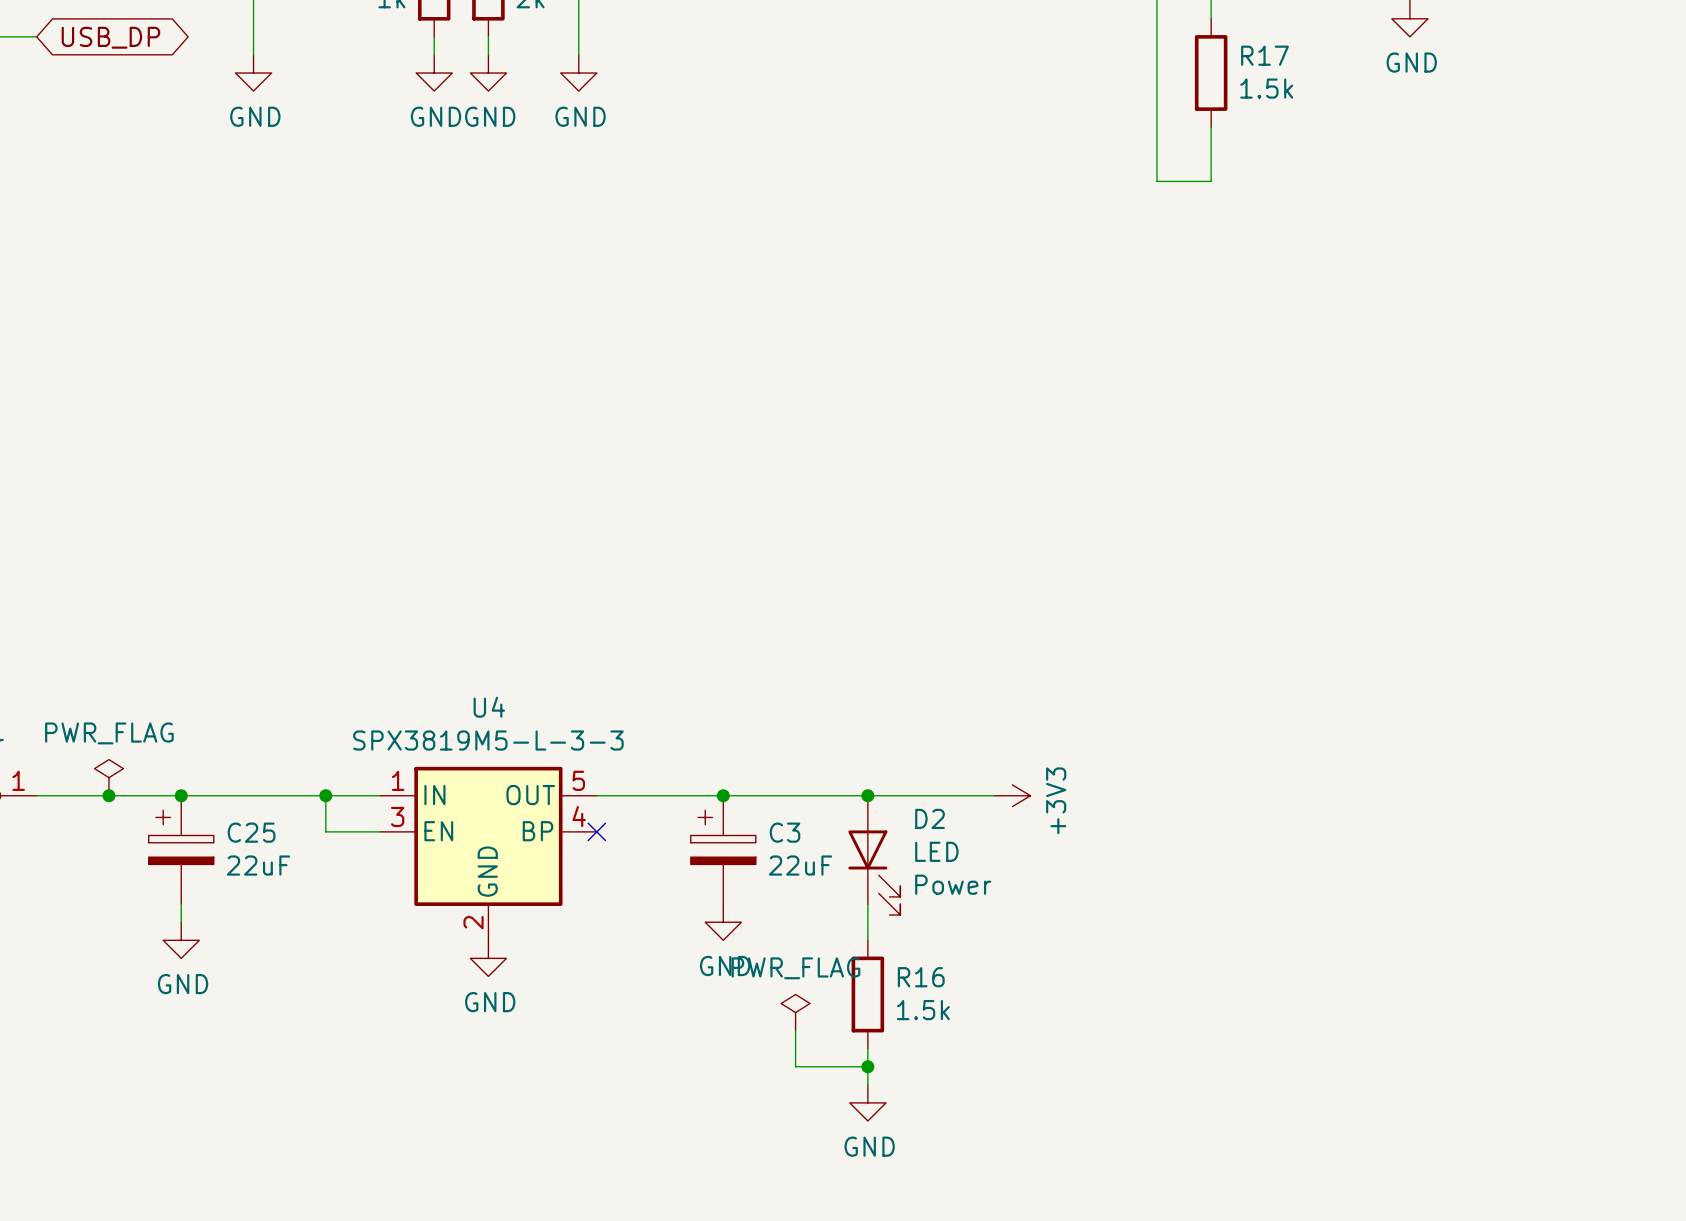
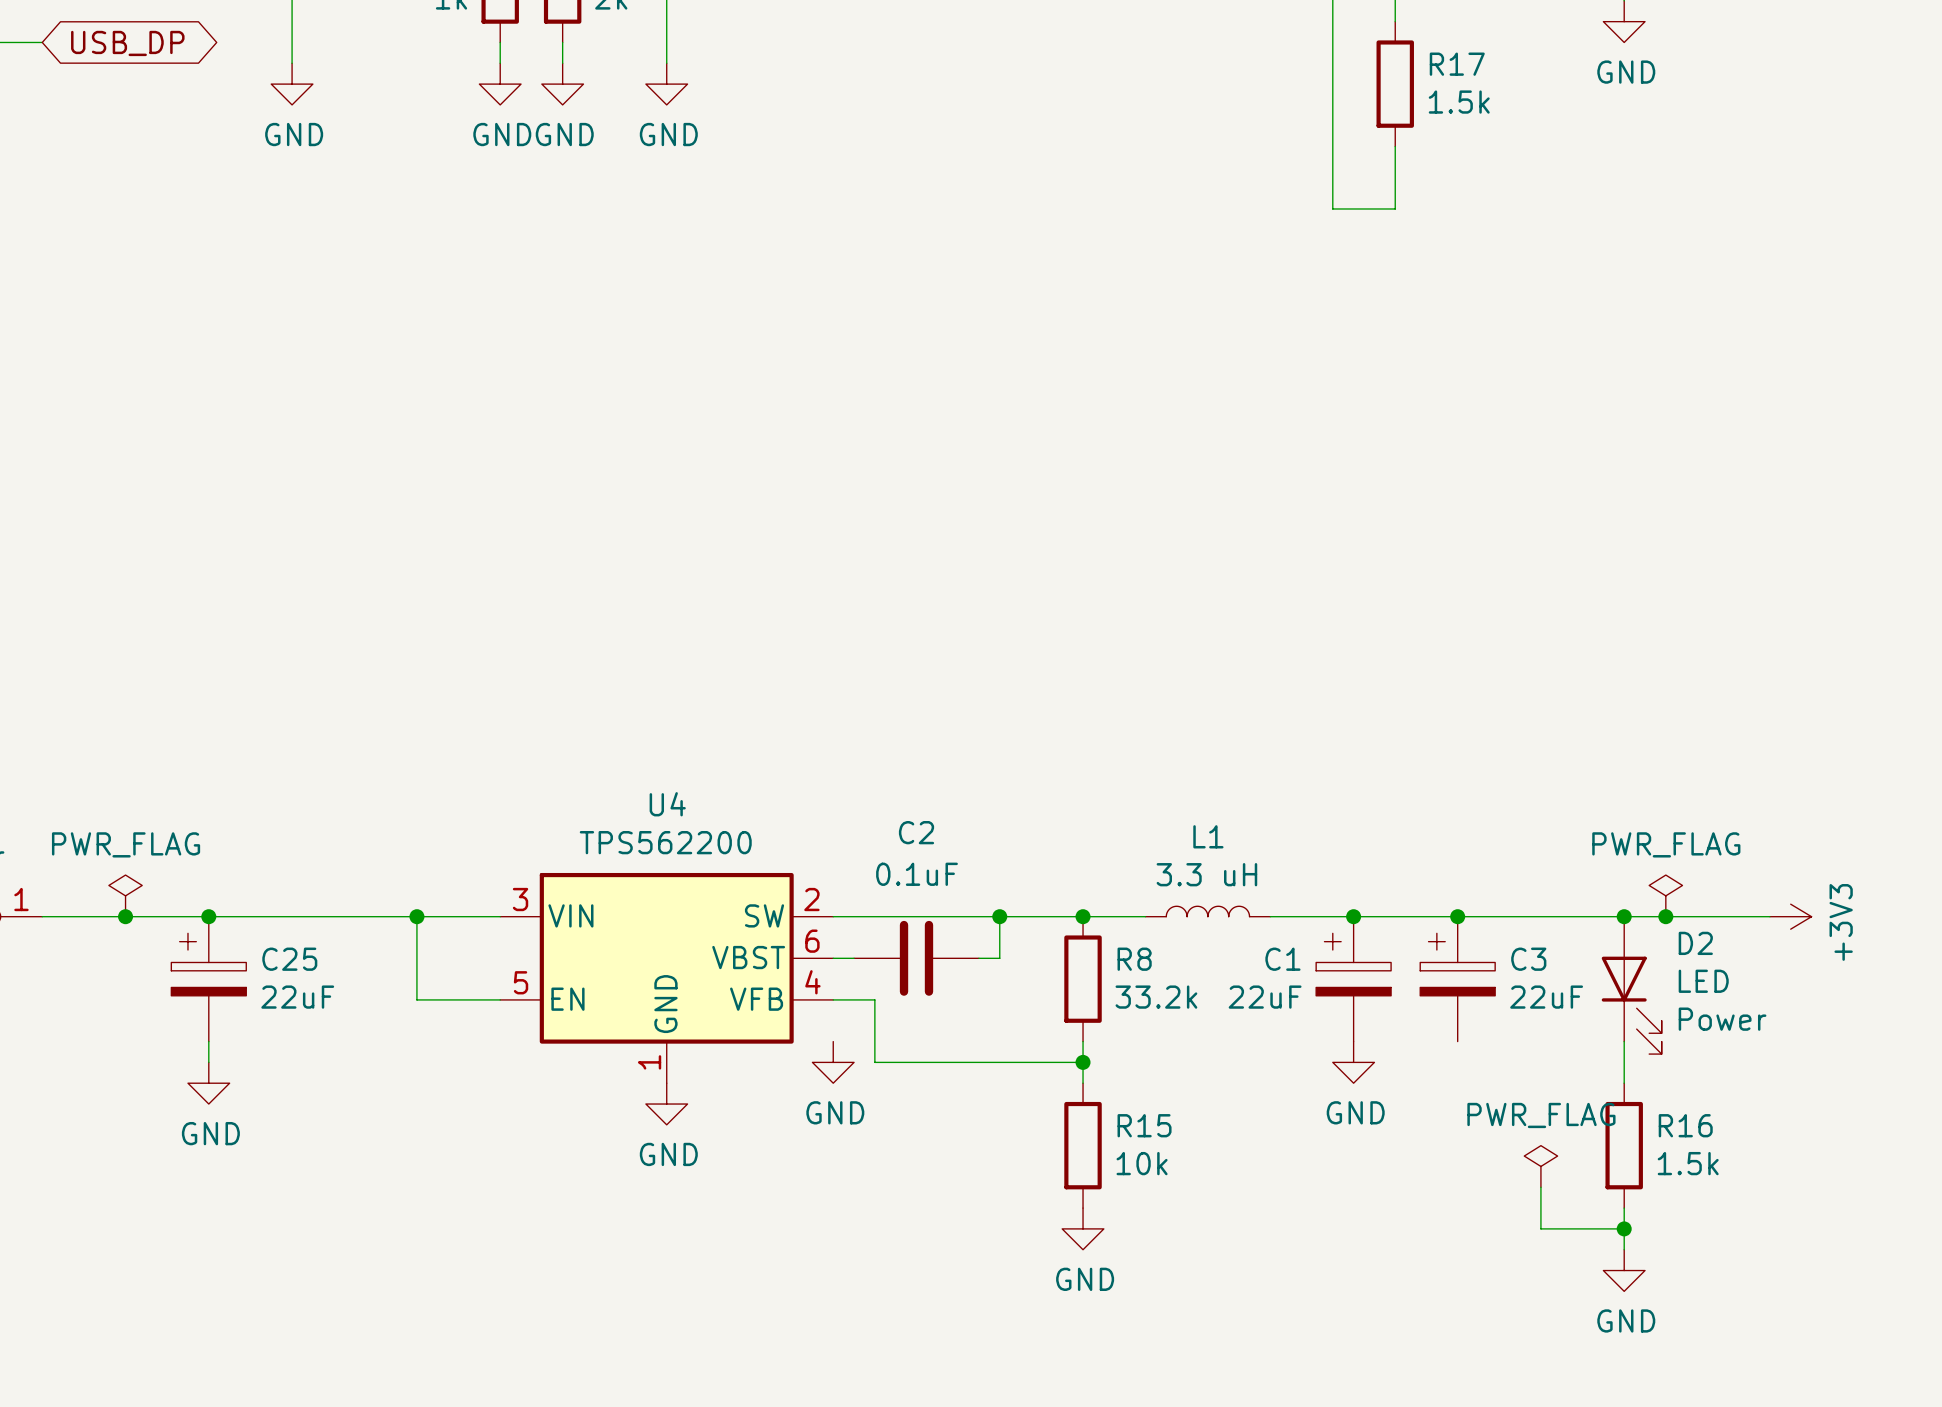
U4 value: SPX3819M5-L-3-3 (488, 740) -> TPS562200 (665, 842)
U4 symbol: [380, 766, 597, 941] -> [500, 872, 834, 1084]
power symbol: none -> PWR_FLAG (1665, 895)
L1: none -> 3.3 uH (1207, 911)
wire: (325, 795) (325, 831) (380, 831) -> none
junction position: (325, 795) -> (416, 916)
wire: none -> (416, 916) (416, 999) (500, 999)
junction: (723, 795) -> none
junction: none -> (1083, 916)
power symbol: +3V3 (1012, 795) -> none
wire: none -> (1270, 916) (1769, 916)
junction: none -> (1353, 916)
junction: none -> (1457, 916)
junction: none -> (1624, 916)
junction: none -> (1665, 916)
power symbol: none -> +3V3 (1790, 916)
no-connect mark: (596, 831) -> none
wire: none -> (833, 958) (854, 958)
C2: none -> 0.1uF (916, 958)
C3 position: (723, 849) -> (1457, 979)
R8: none -> 33.2k (1083, 979)
C1: none -> 22uF (1353, 979)
D2 position: (874, 855) -> (1631, 985)
wire: none -> (833, 999) (874, 999) (874, 1062) (1083, 1062)
wire: (867, 904) (867, 940) -> (1083, 1041) (1083, 1083)
wire: none -> (1624, 1041) (1624, 1083)
junction: none -> (1083, 1062)
power symbol: none -> GND (1353, 1062)
power symbol position: GND (488, 958) -> GND (666, 1104)
R16 position: (867, 994) -> (1624, 1145)
R15: none -> 10k (1083, 1145)
power symbol: PWR_FLAG (795, 1012) -> none
power symbol: none -> PWR_FLAG (1540, 1166)
wire: (795, 1030) (795, 1066) (867, 1066) -> none
wire: none -> (1540, 1187) (1540, 1228) (1624, 1228)
wire: (867, 1048) (867, 1084) -> none
wire: none -> (1624, 1208) (1624, 1249)
junction: (867, 1066) -> none
junction: none -> (1624, 1228)
power symbol position: GND (867, 1102) -> GND (1083, 1228)
power symbol: none -> GND (1624, 1270)

